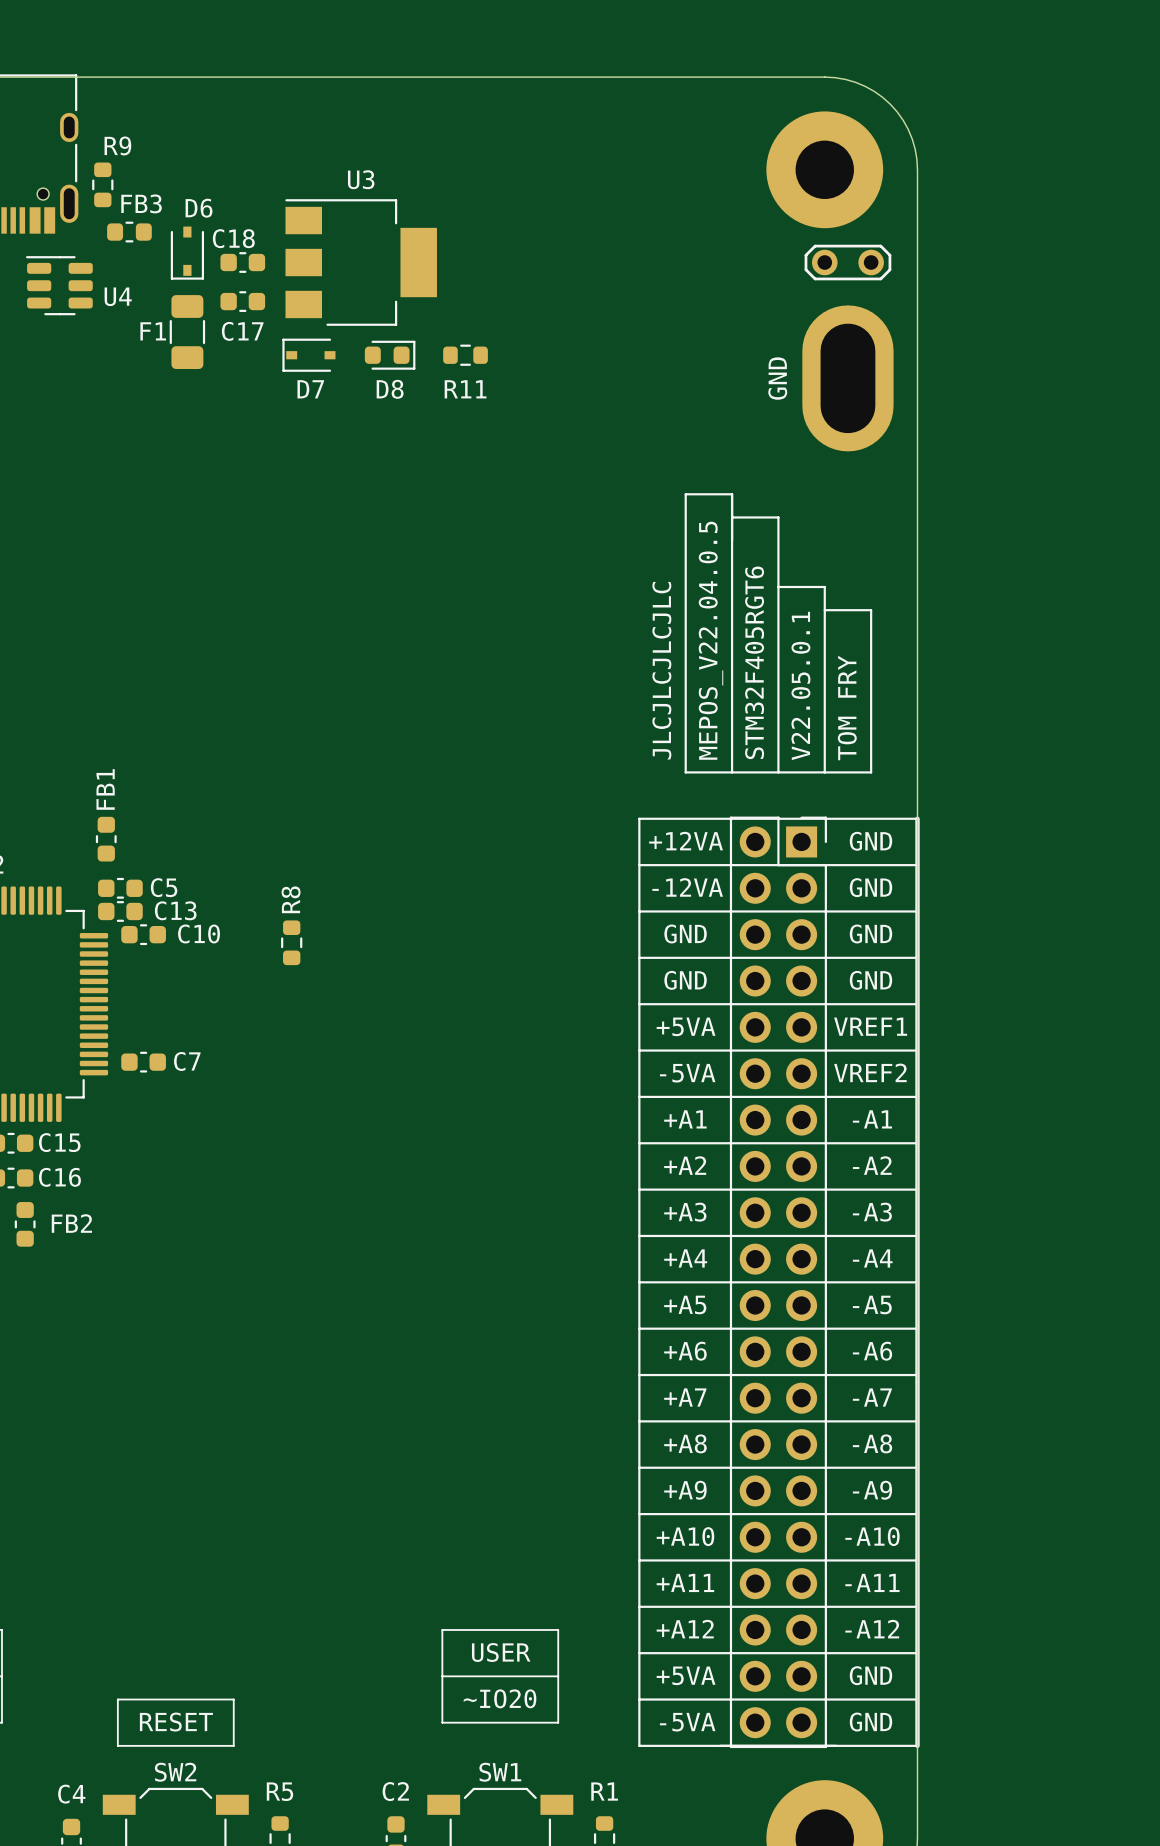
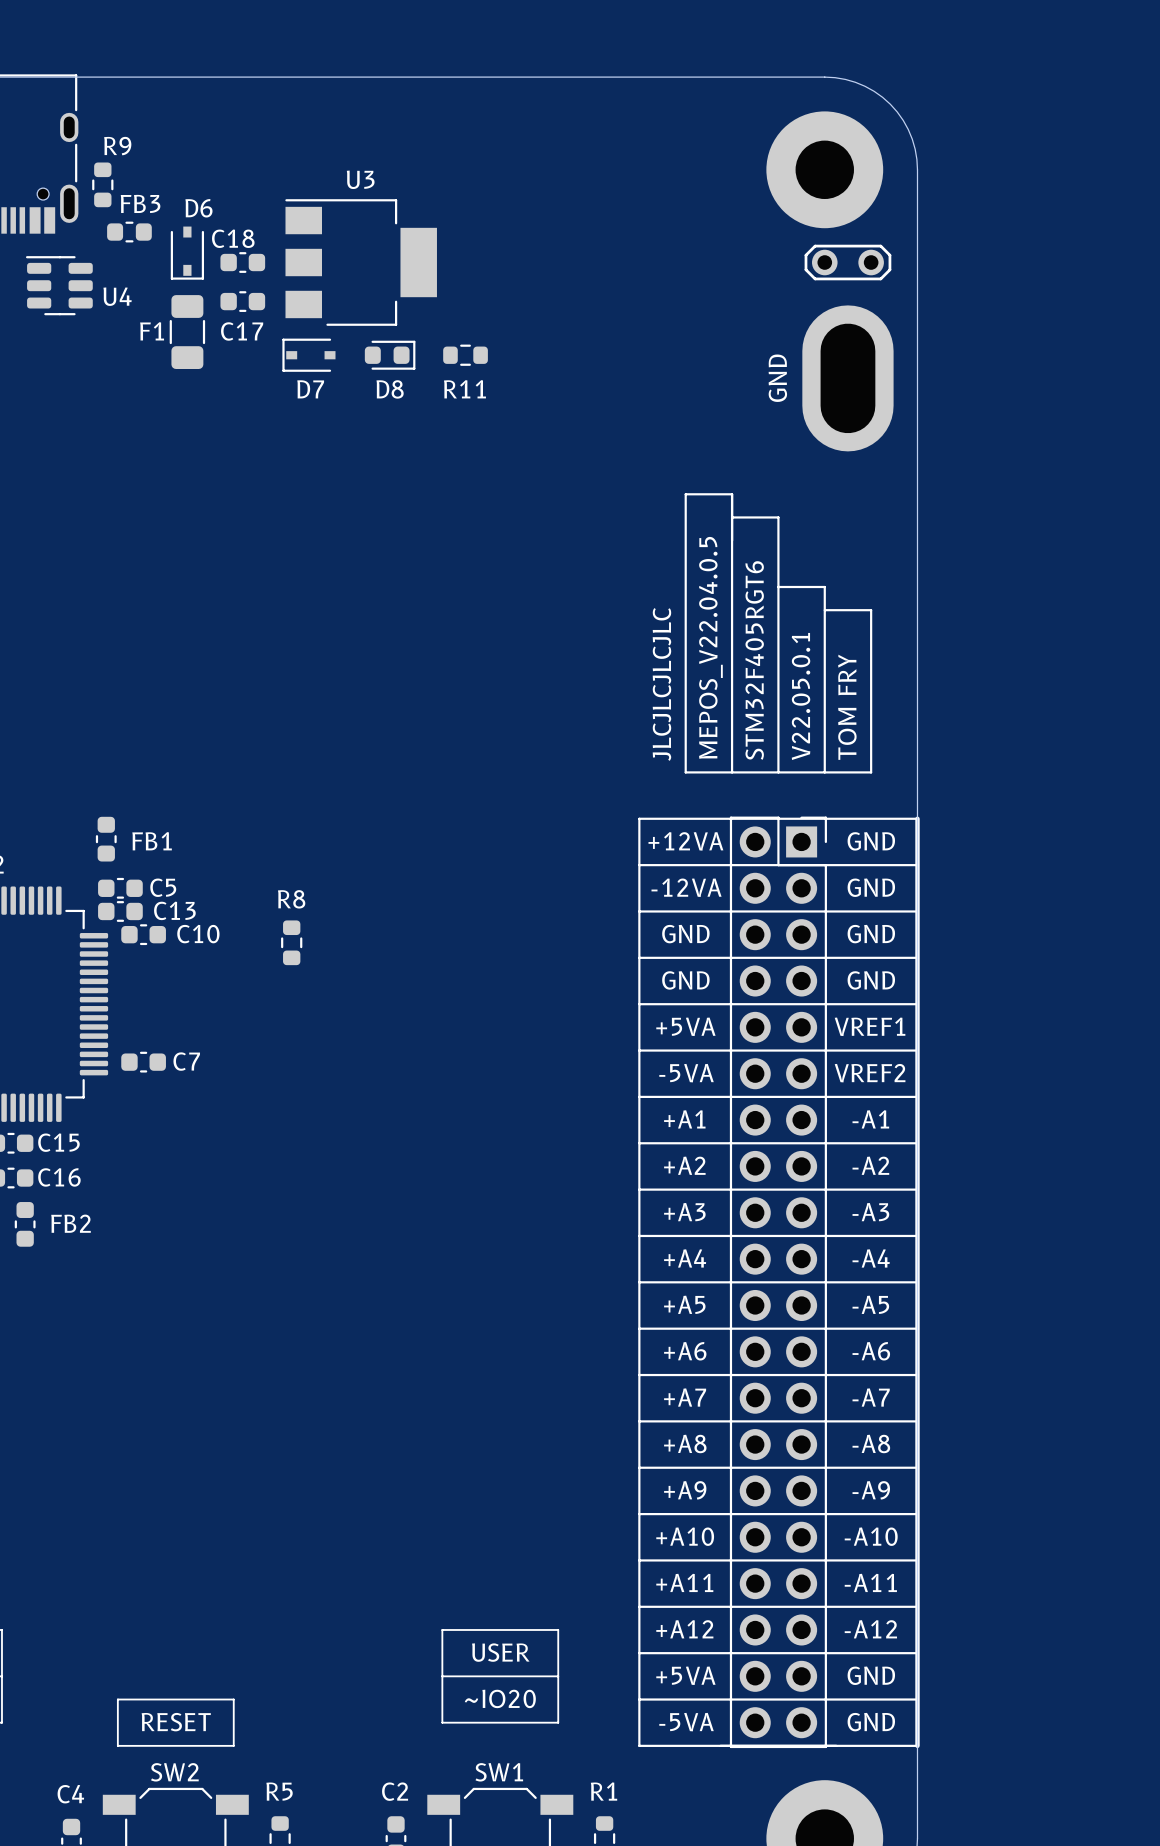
FB1 name rotation: 0° (105, 789) -> 90° clockwise (152, 841)
FB1 name position: FB1 (105, 789) -> FB1 (152, 841)
R8 name rotation: 0° (291, 899) -> 90° clockwise (291, 899)

